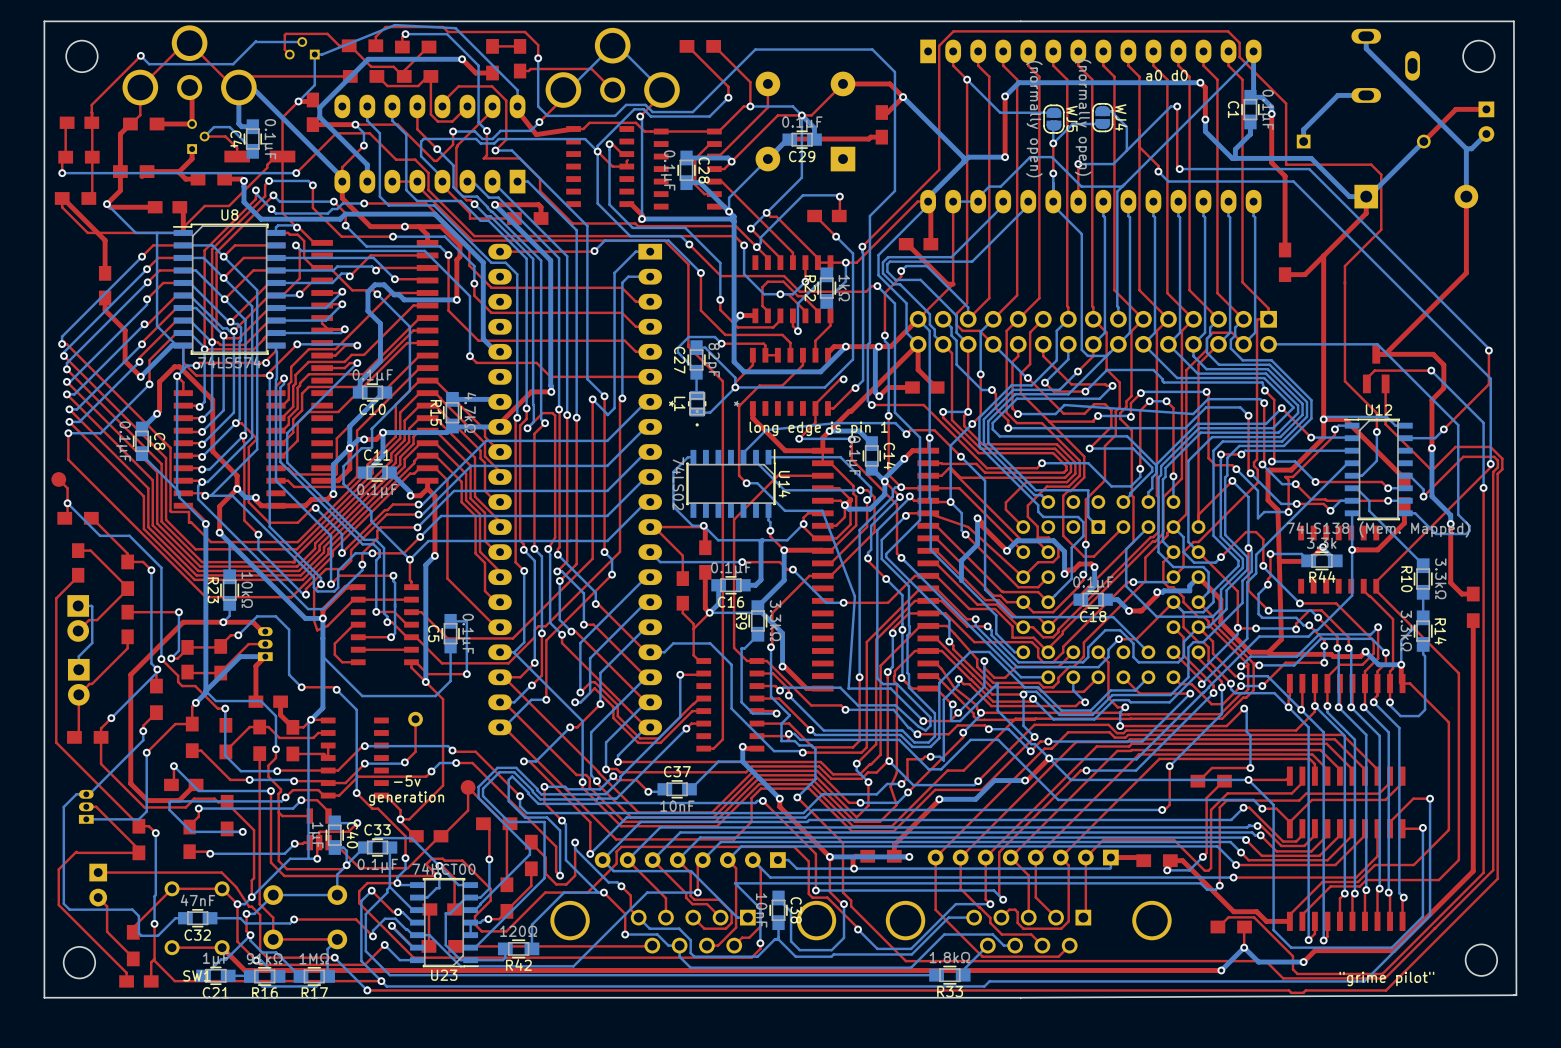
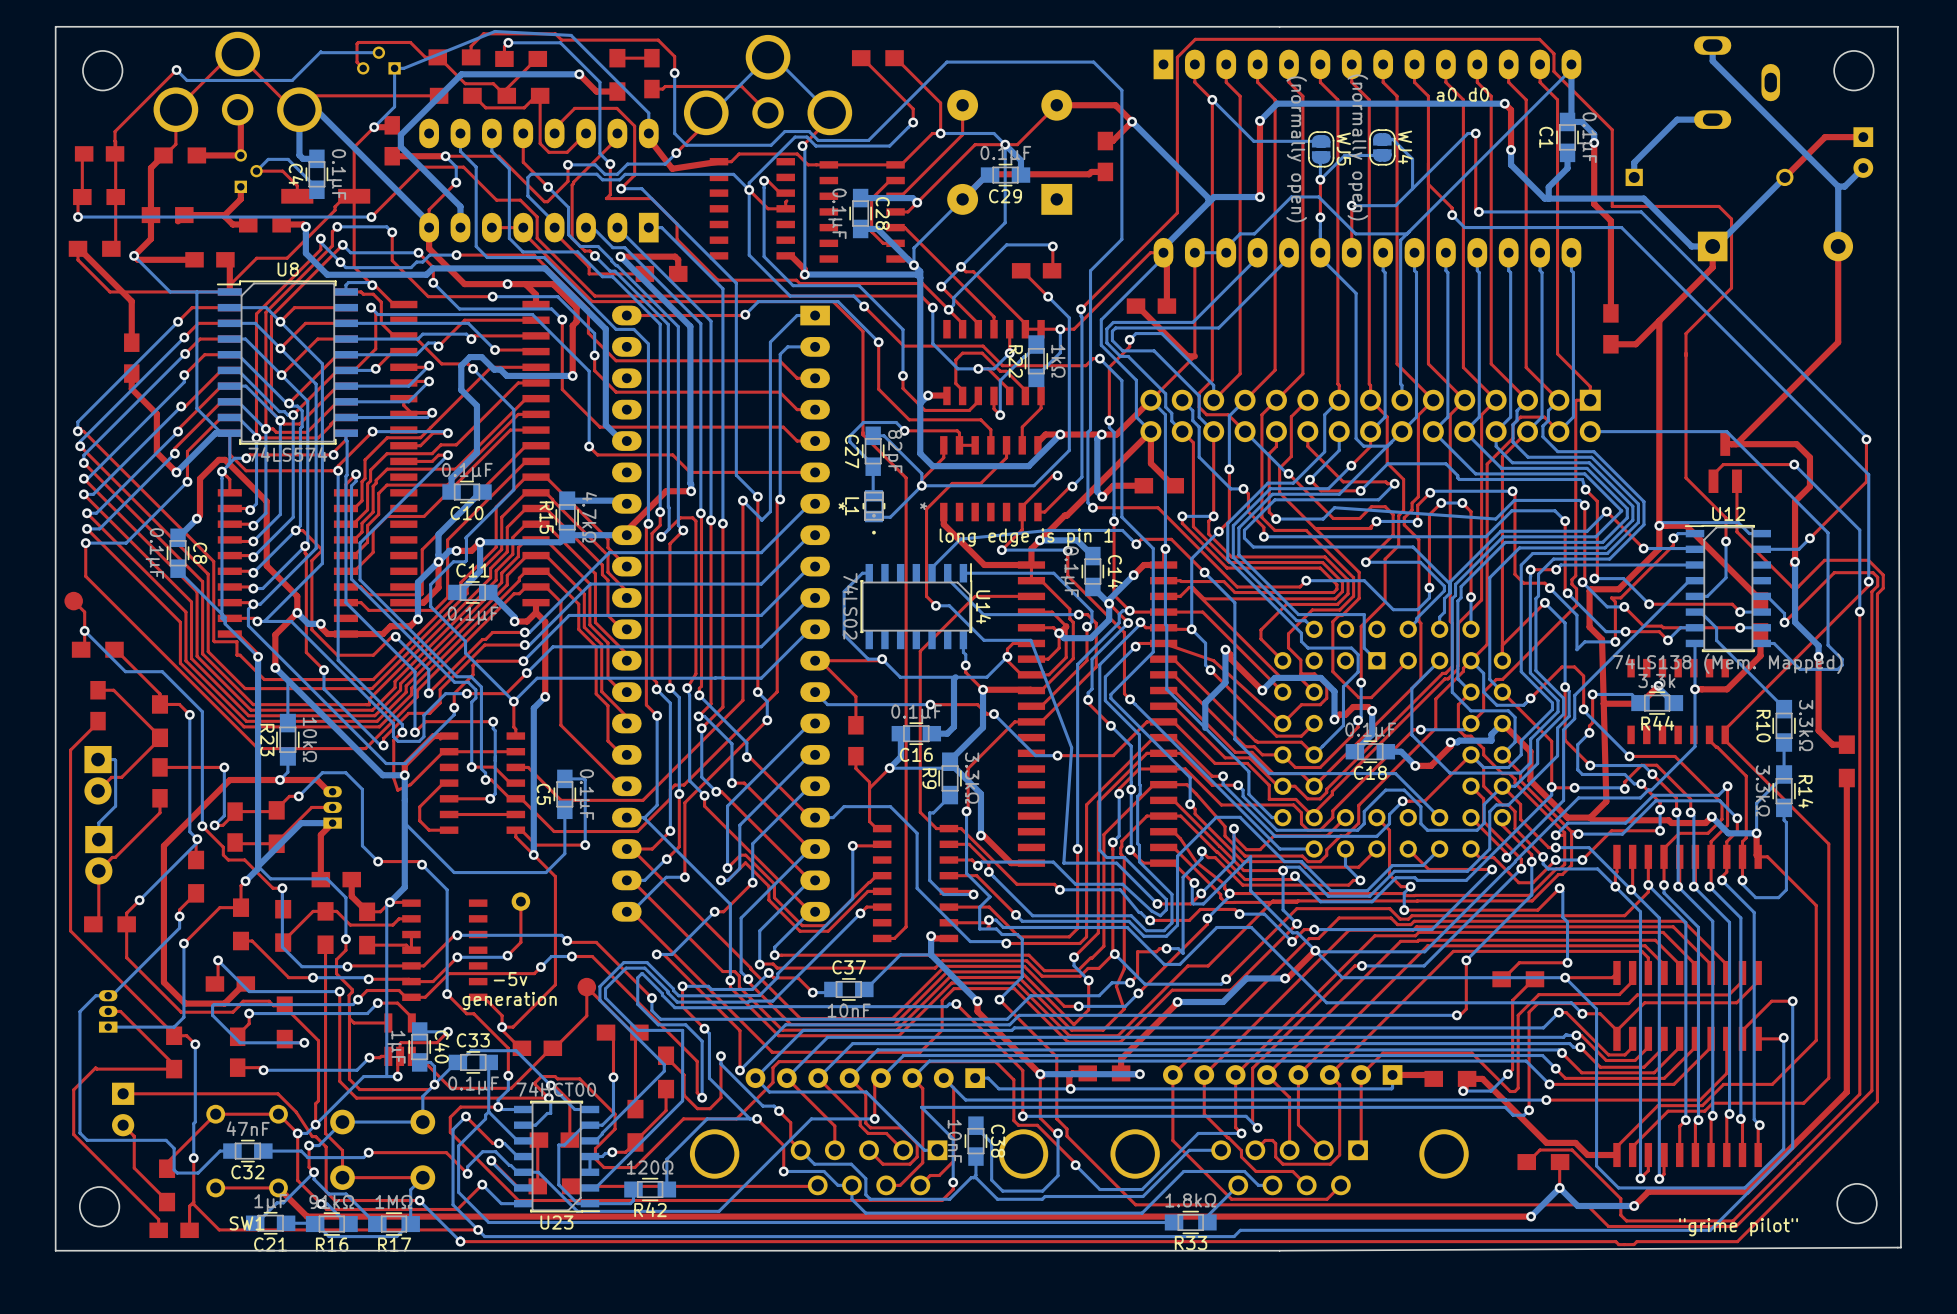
top track: (703, 525) (705, 547) -> none
part: (705, 560) -> none
top track: (705, 572) (705, 608) (709, 612) -> none

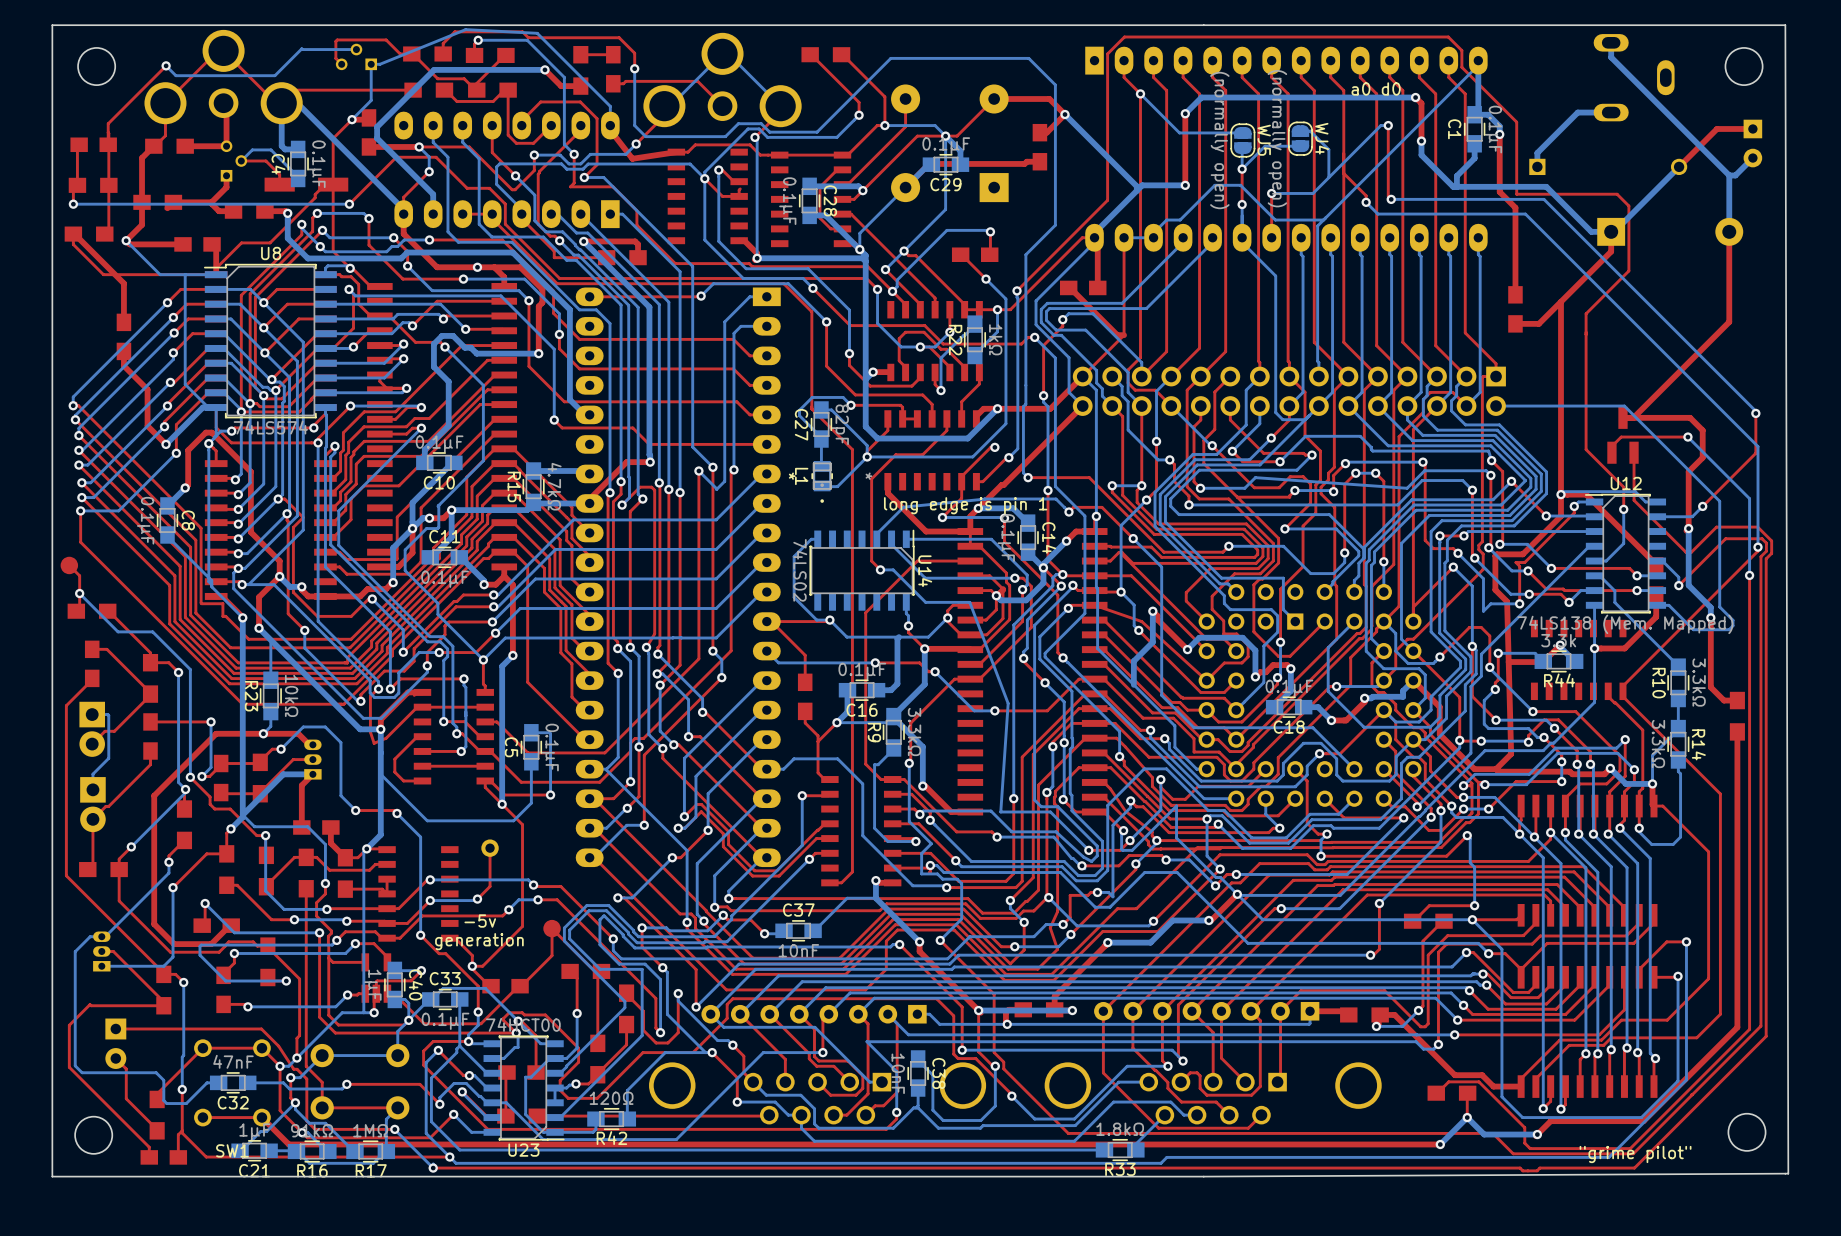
top track: (1150, 431) (1150, 463) (1174, 485) -> none
bottom track: (1101, 434) (1097, 438) (1097, 491) (1102, 496) -> none
via: (1101, 434) -> none
top track: (1143, 485) (1113, 485) (1102, 496) -> none
part: (1159, 485) -> none
via: (1102, 496) -> none

